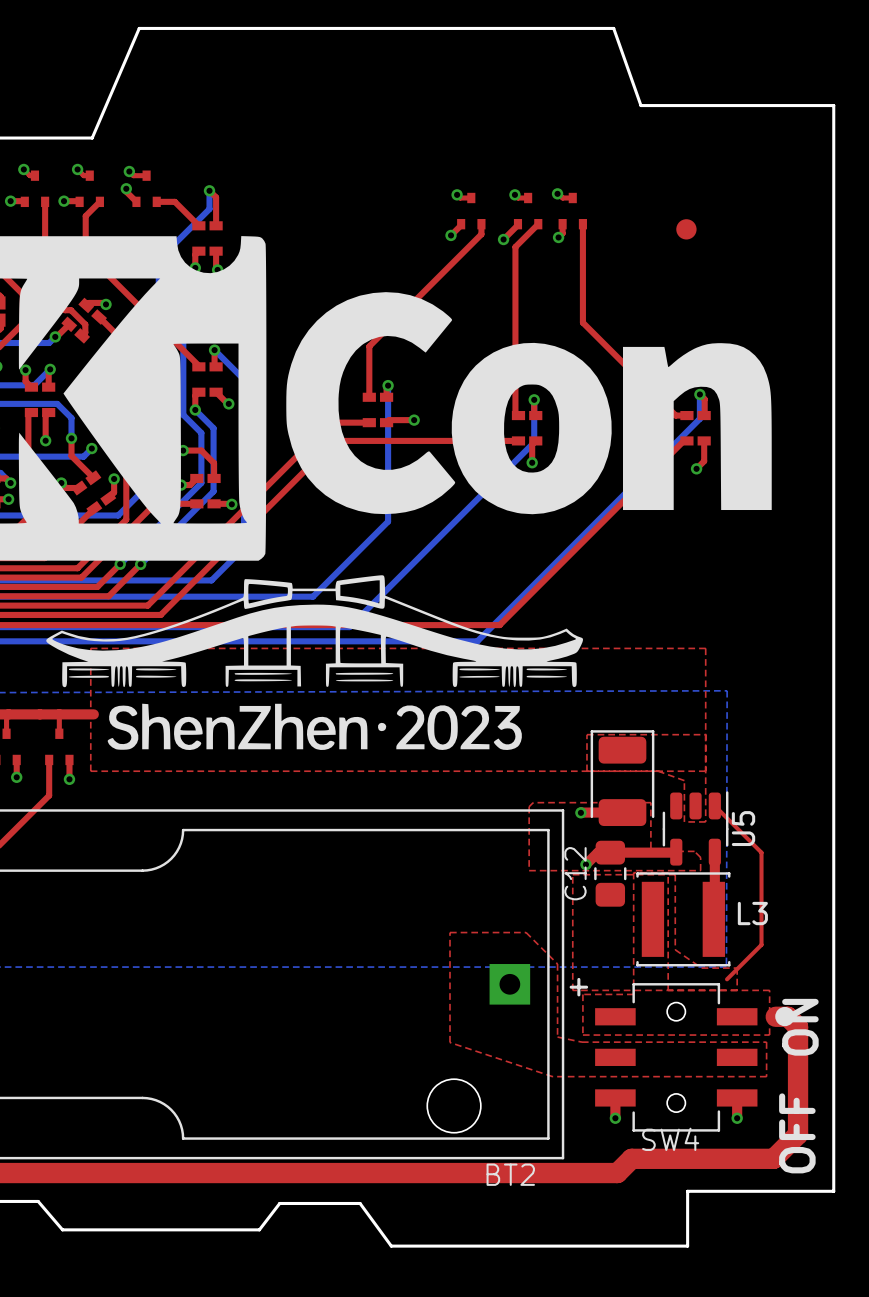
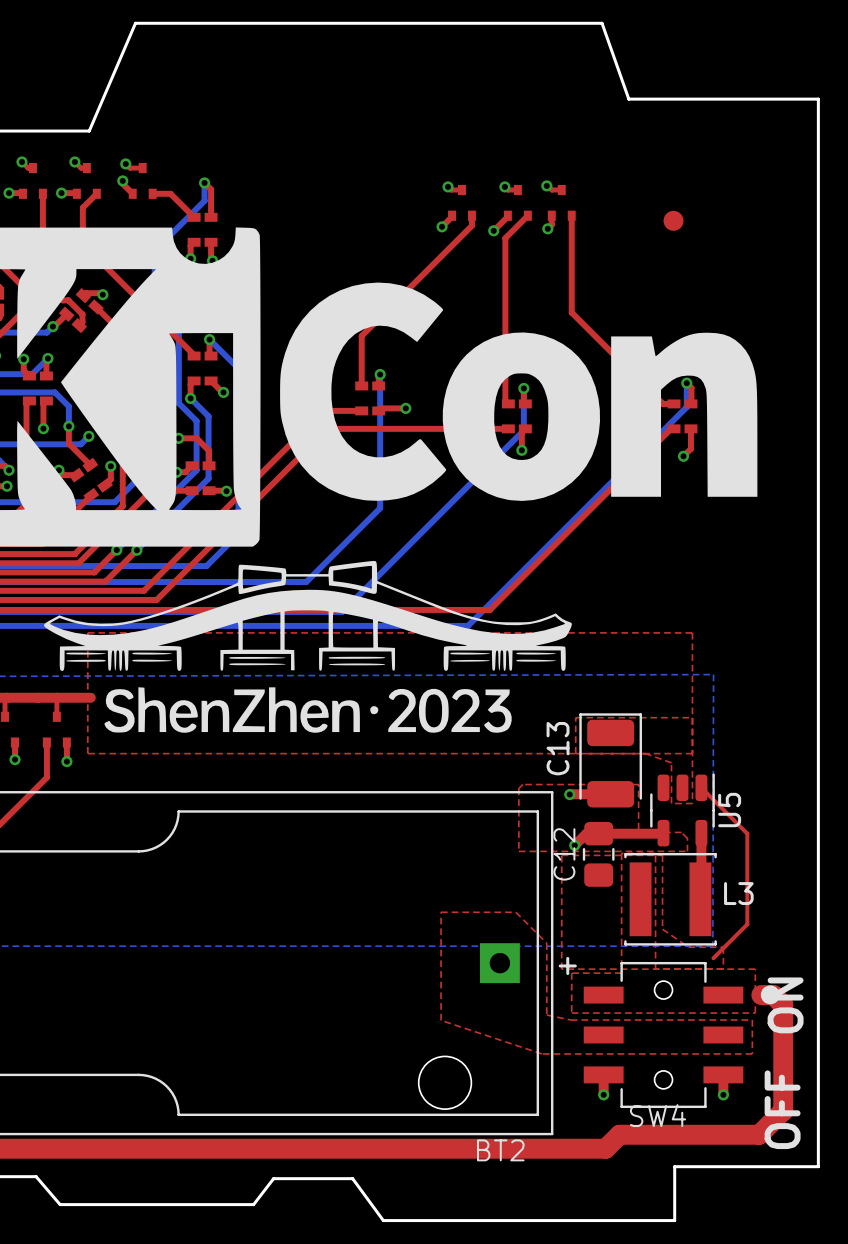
C13 name: none -> C13 (558, 748)

